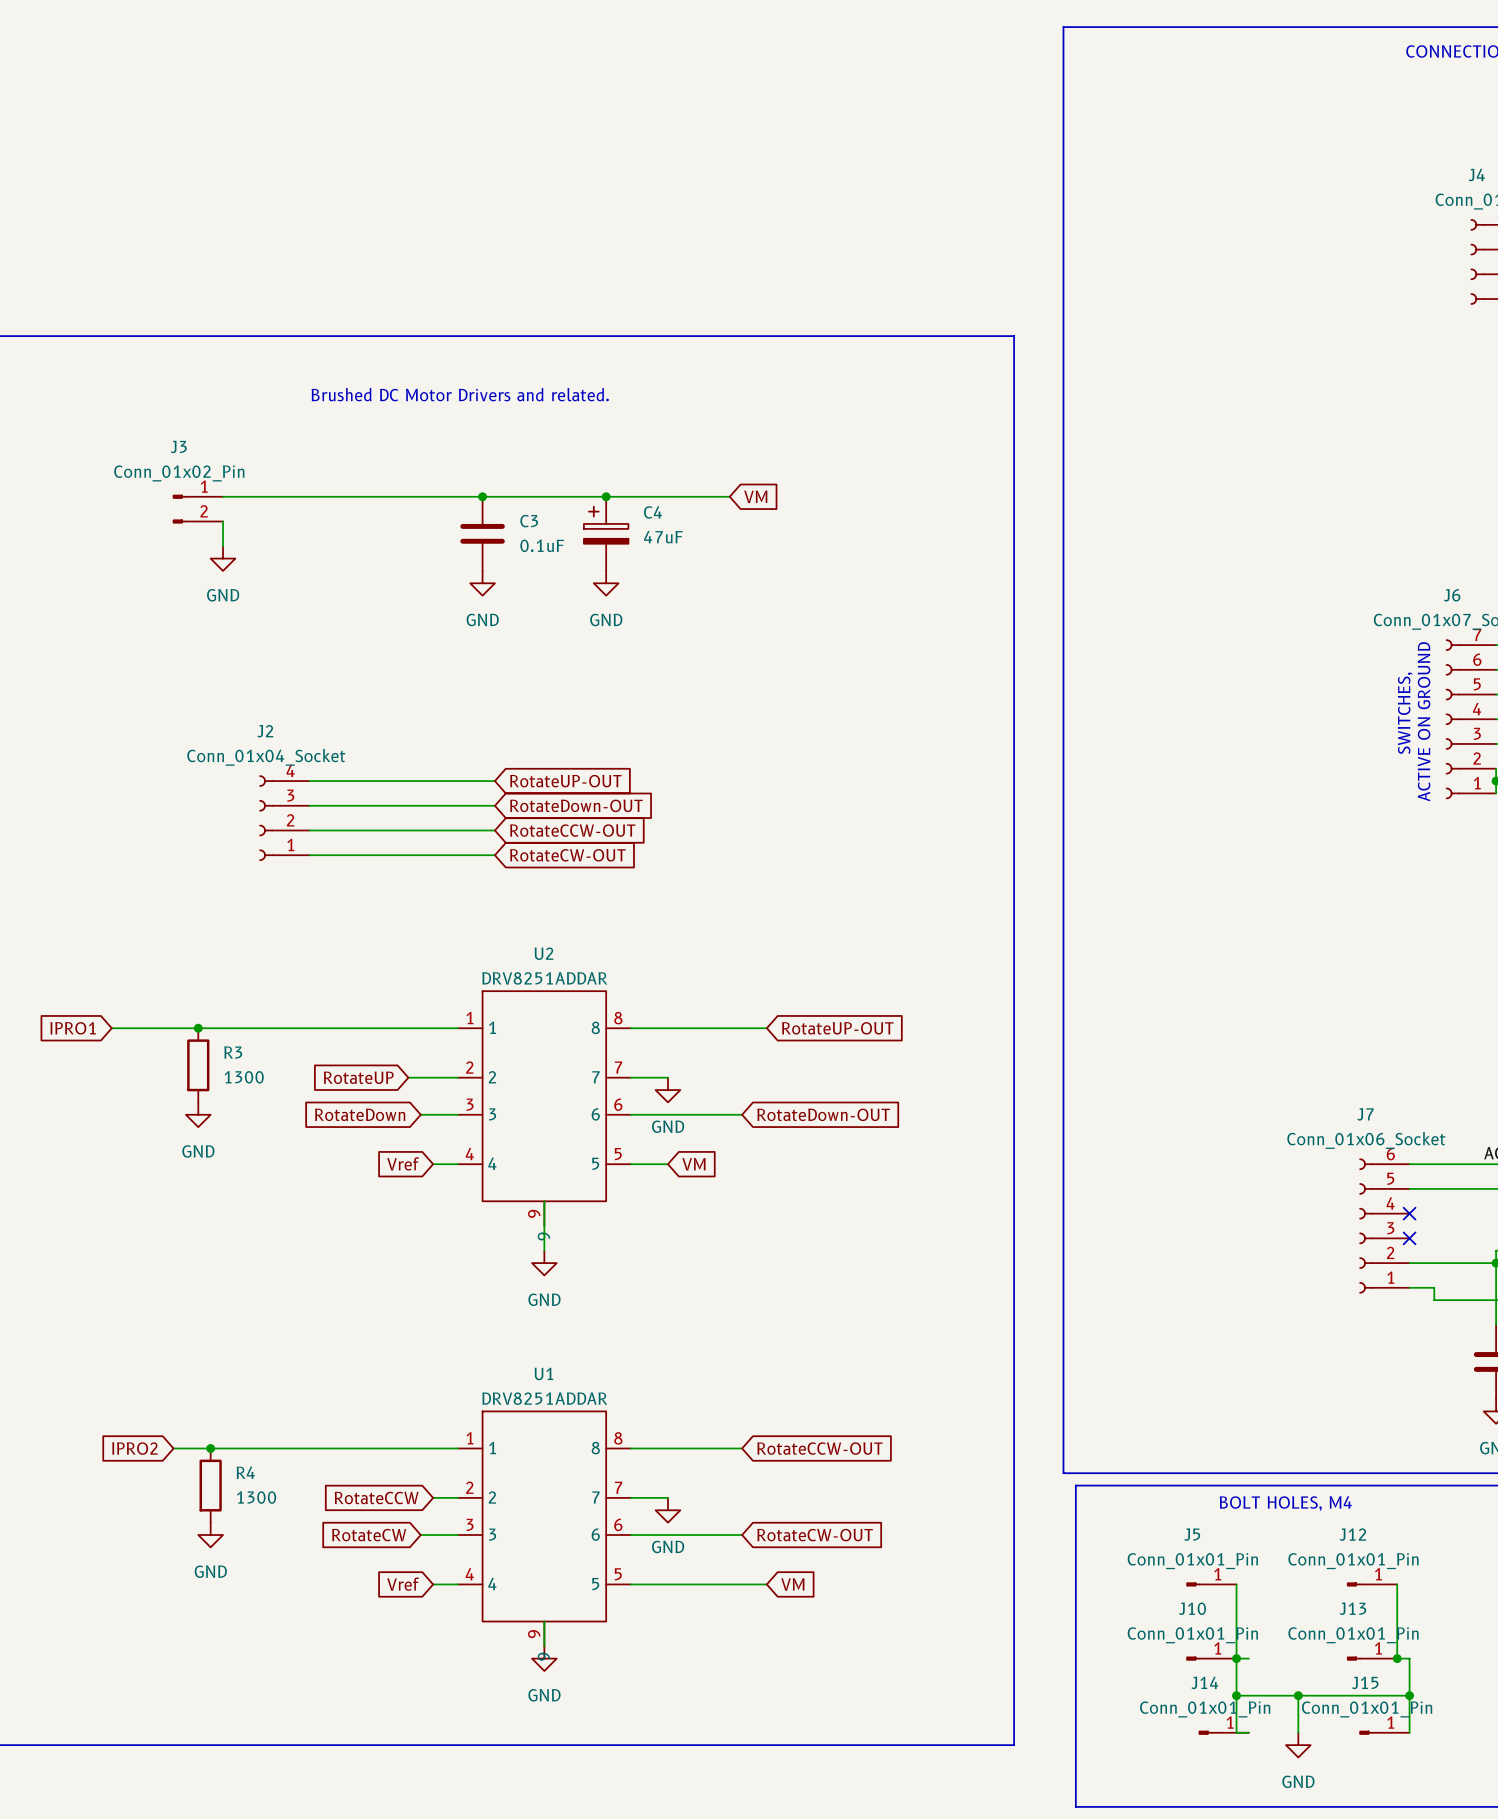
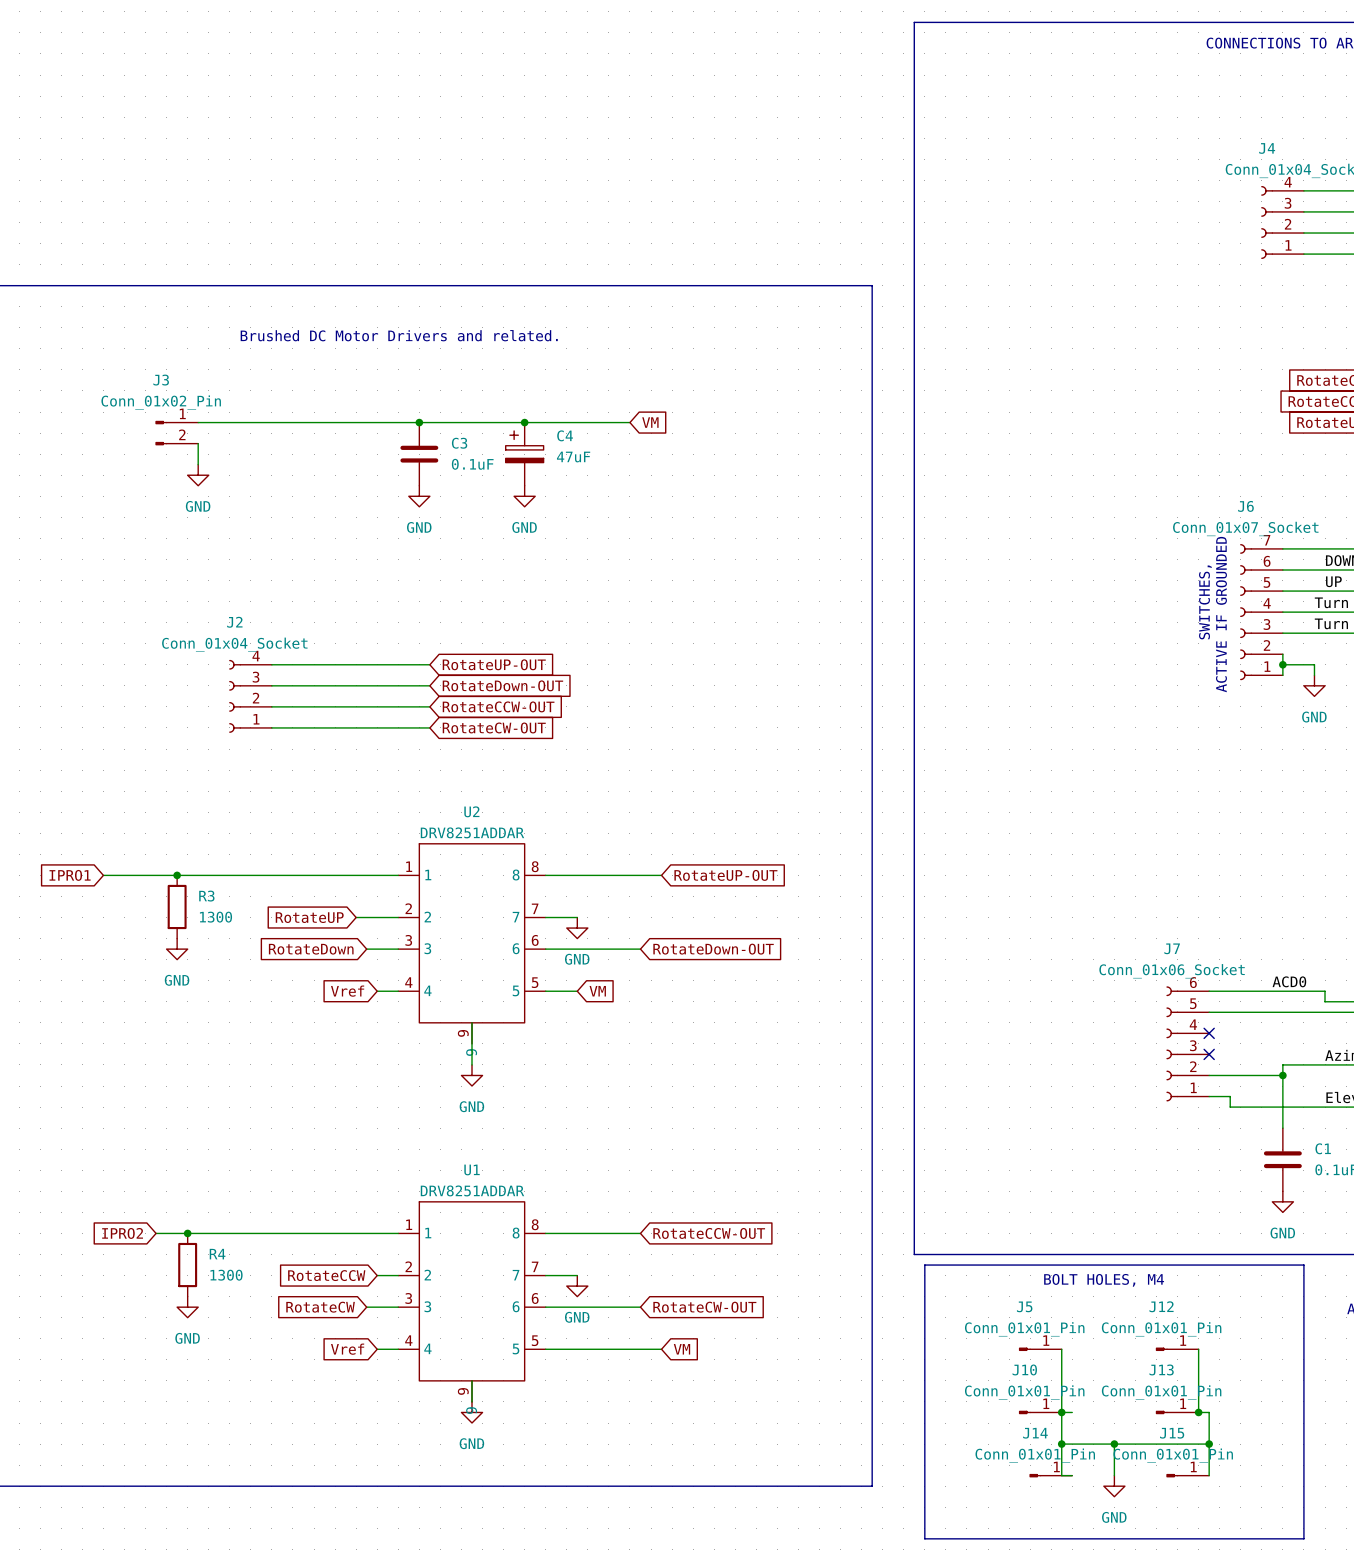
text: ACTIVE ON GROUND (1424, 721) -> ACTIVE IF GROUNDED (1221, 614)

